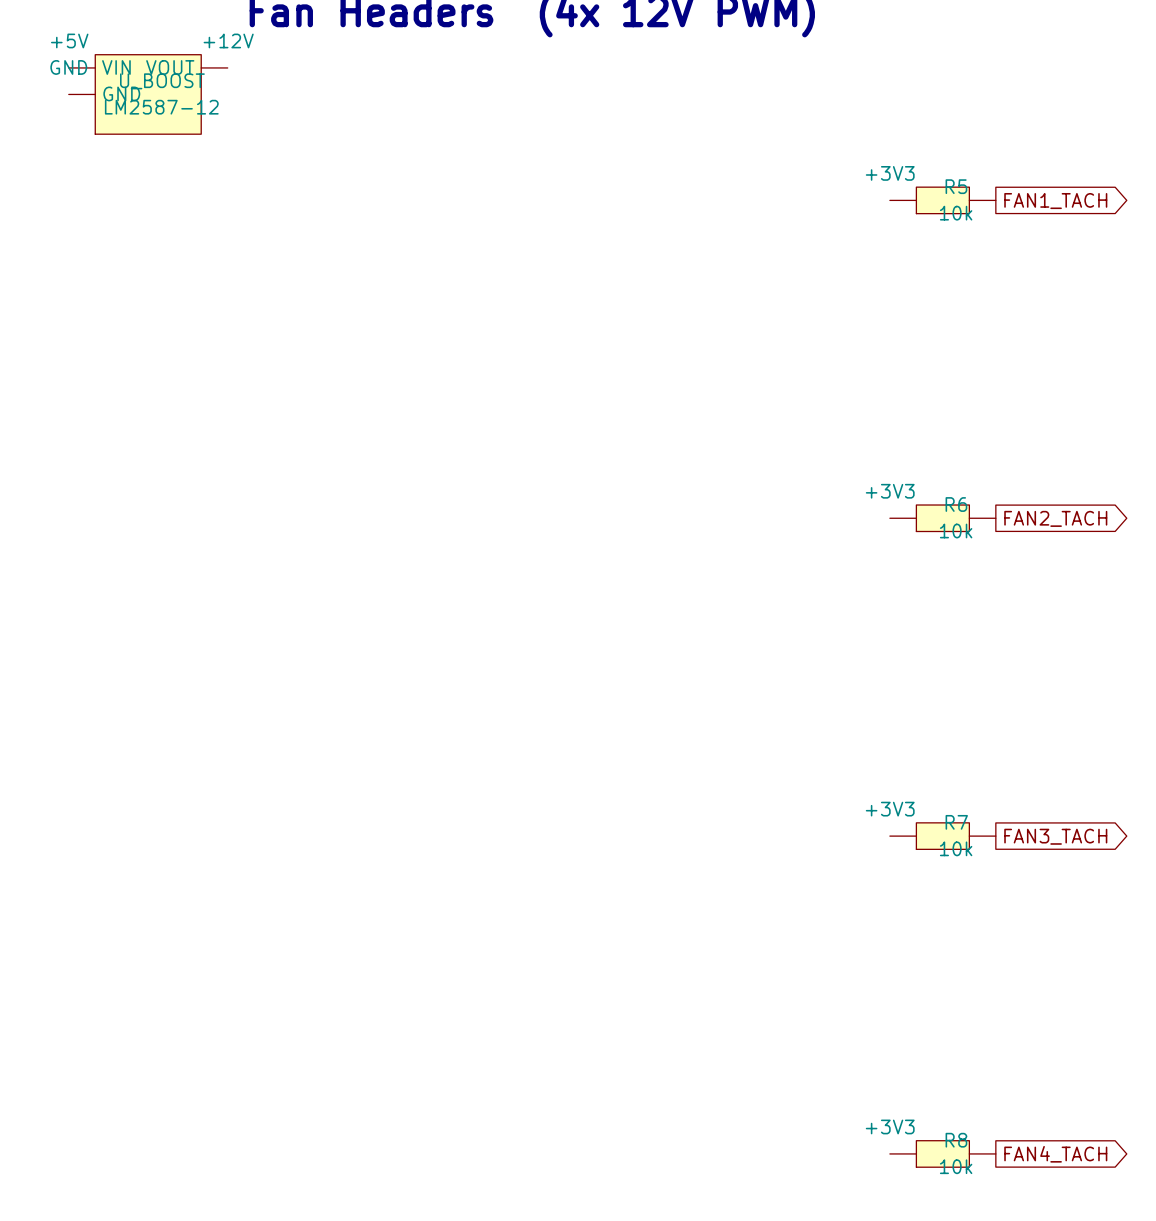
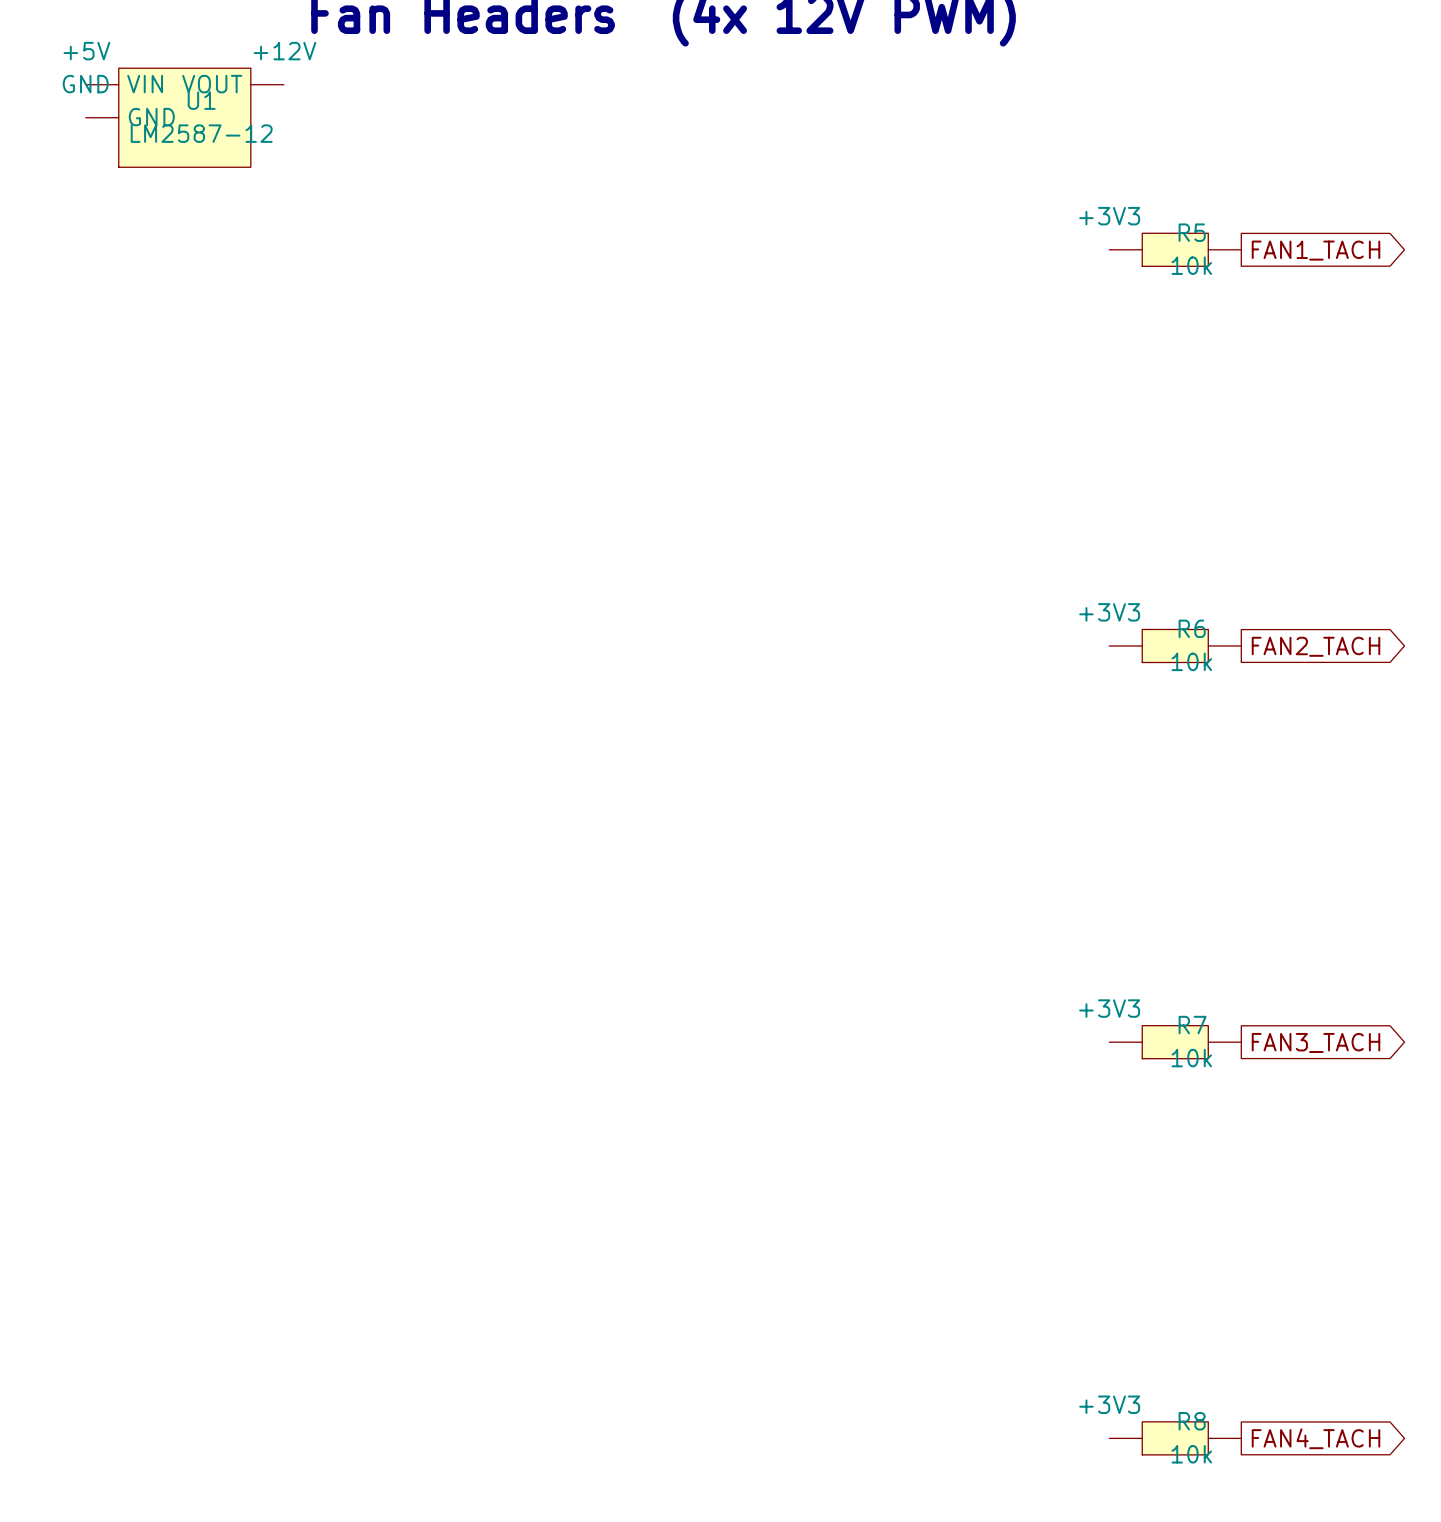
U_BOOST name: U_BOOST (162, 81) -> U1 (201, 100)

